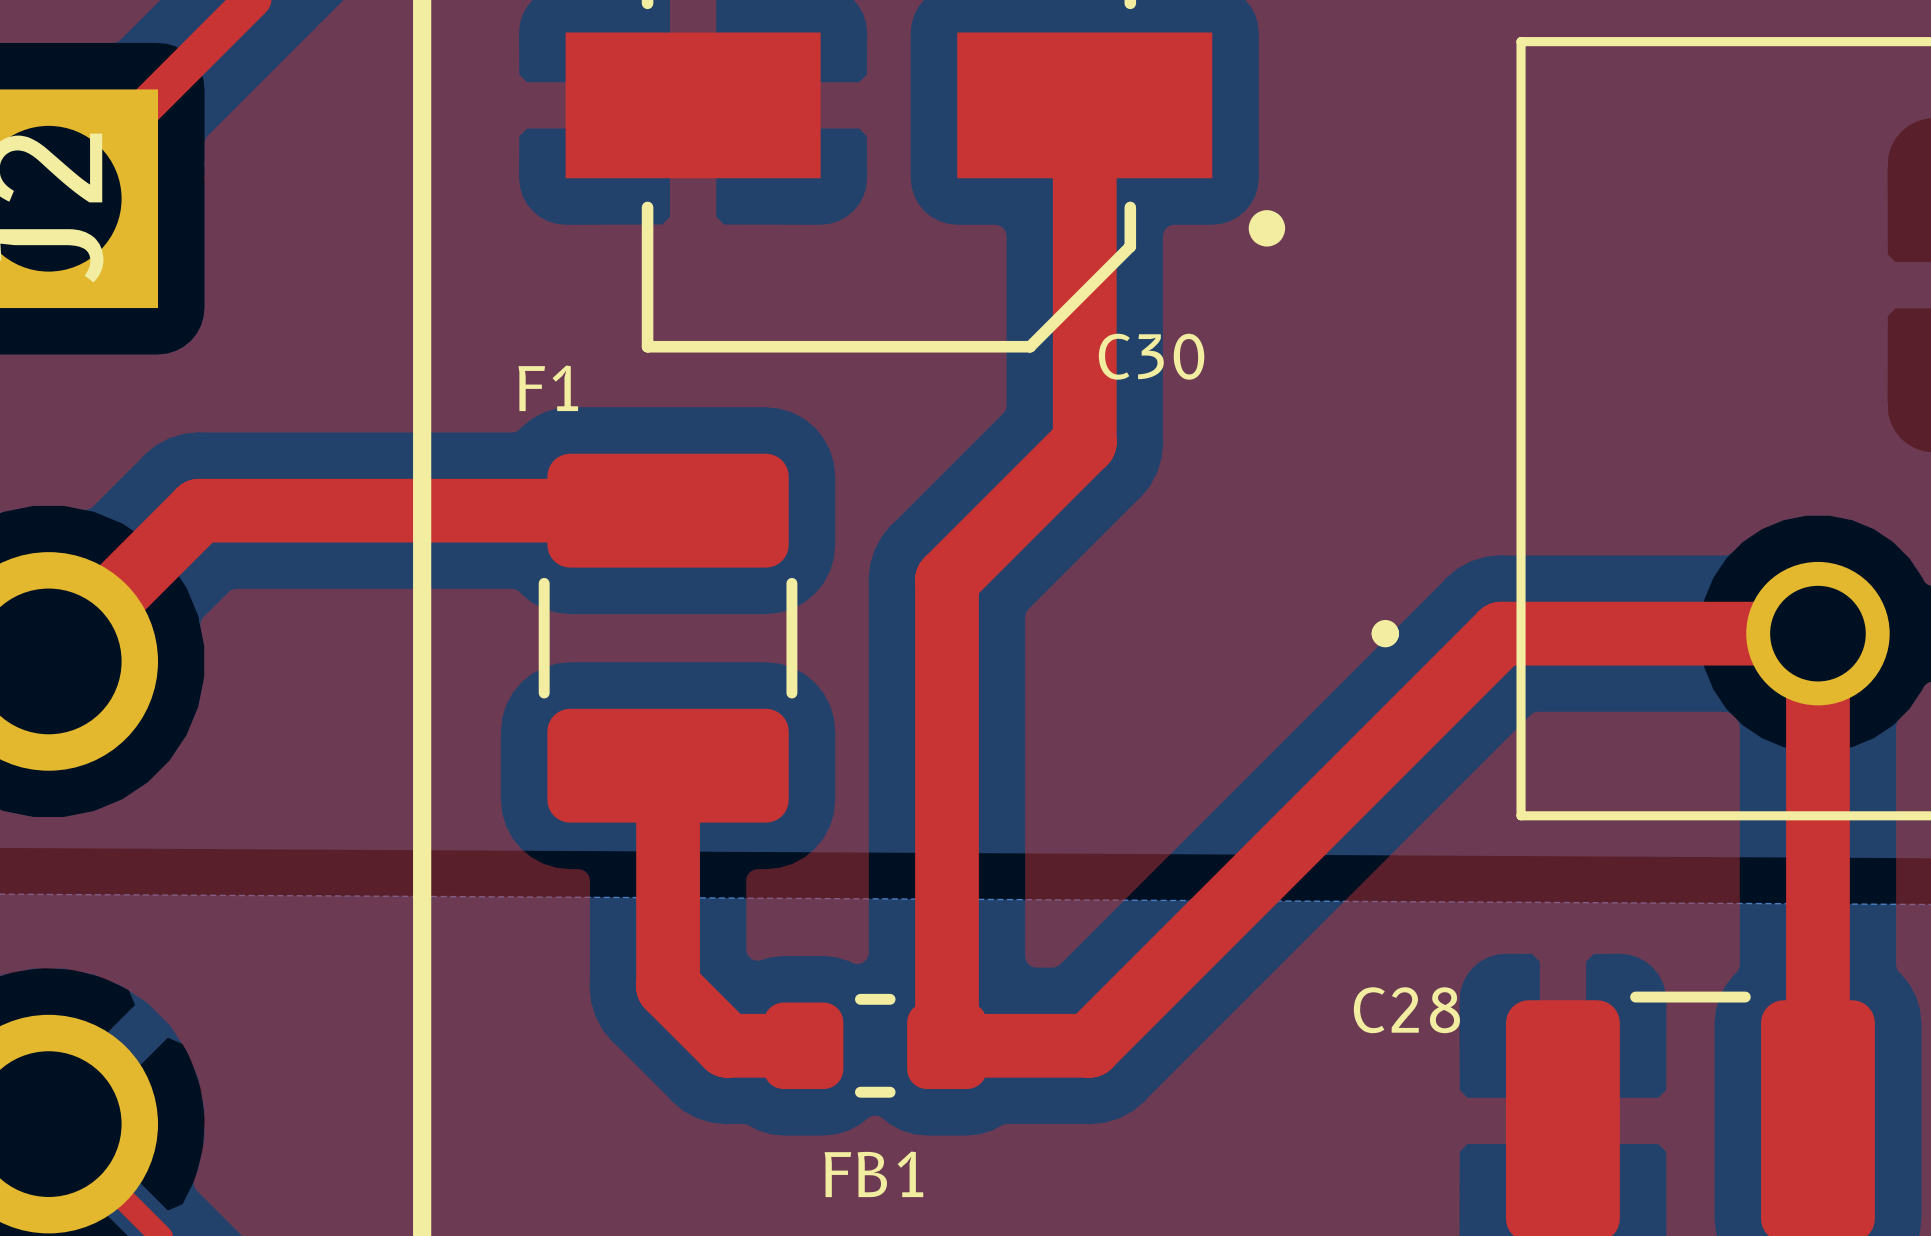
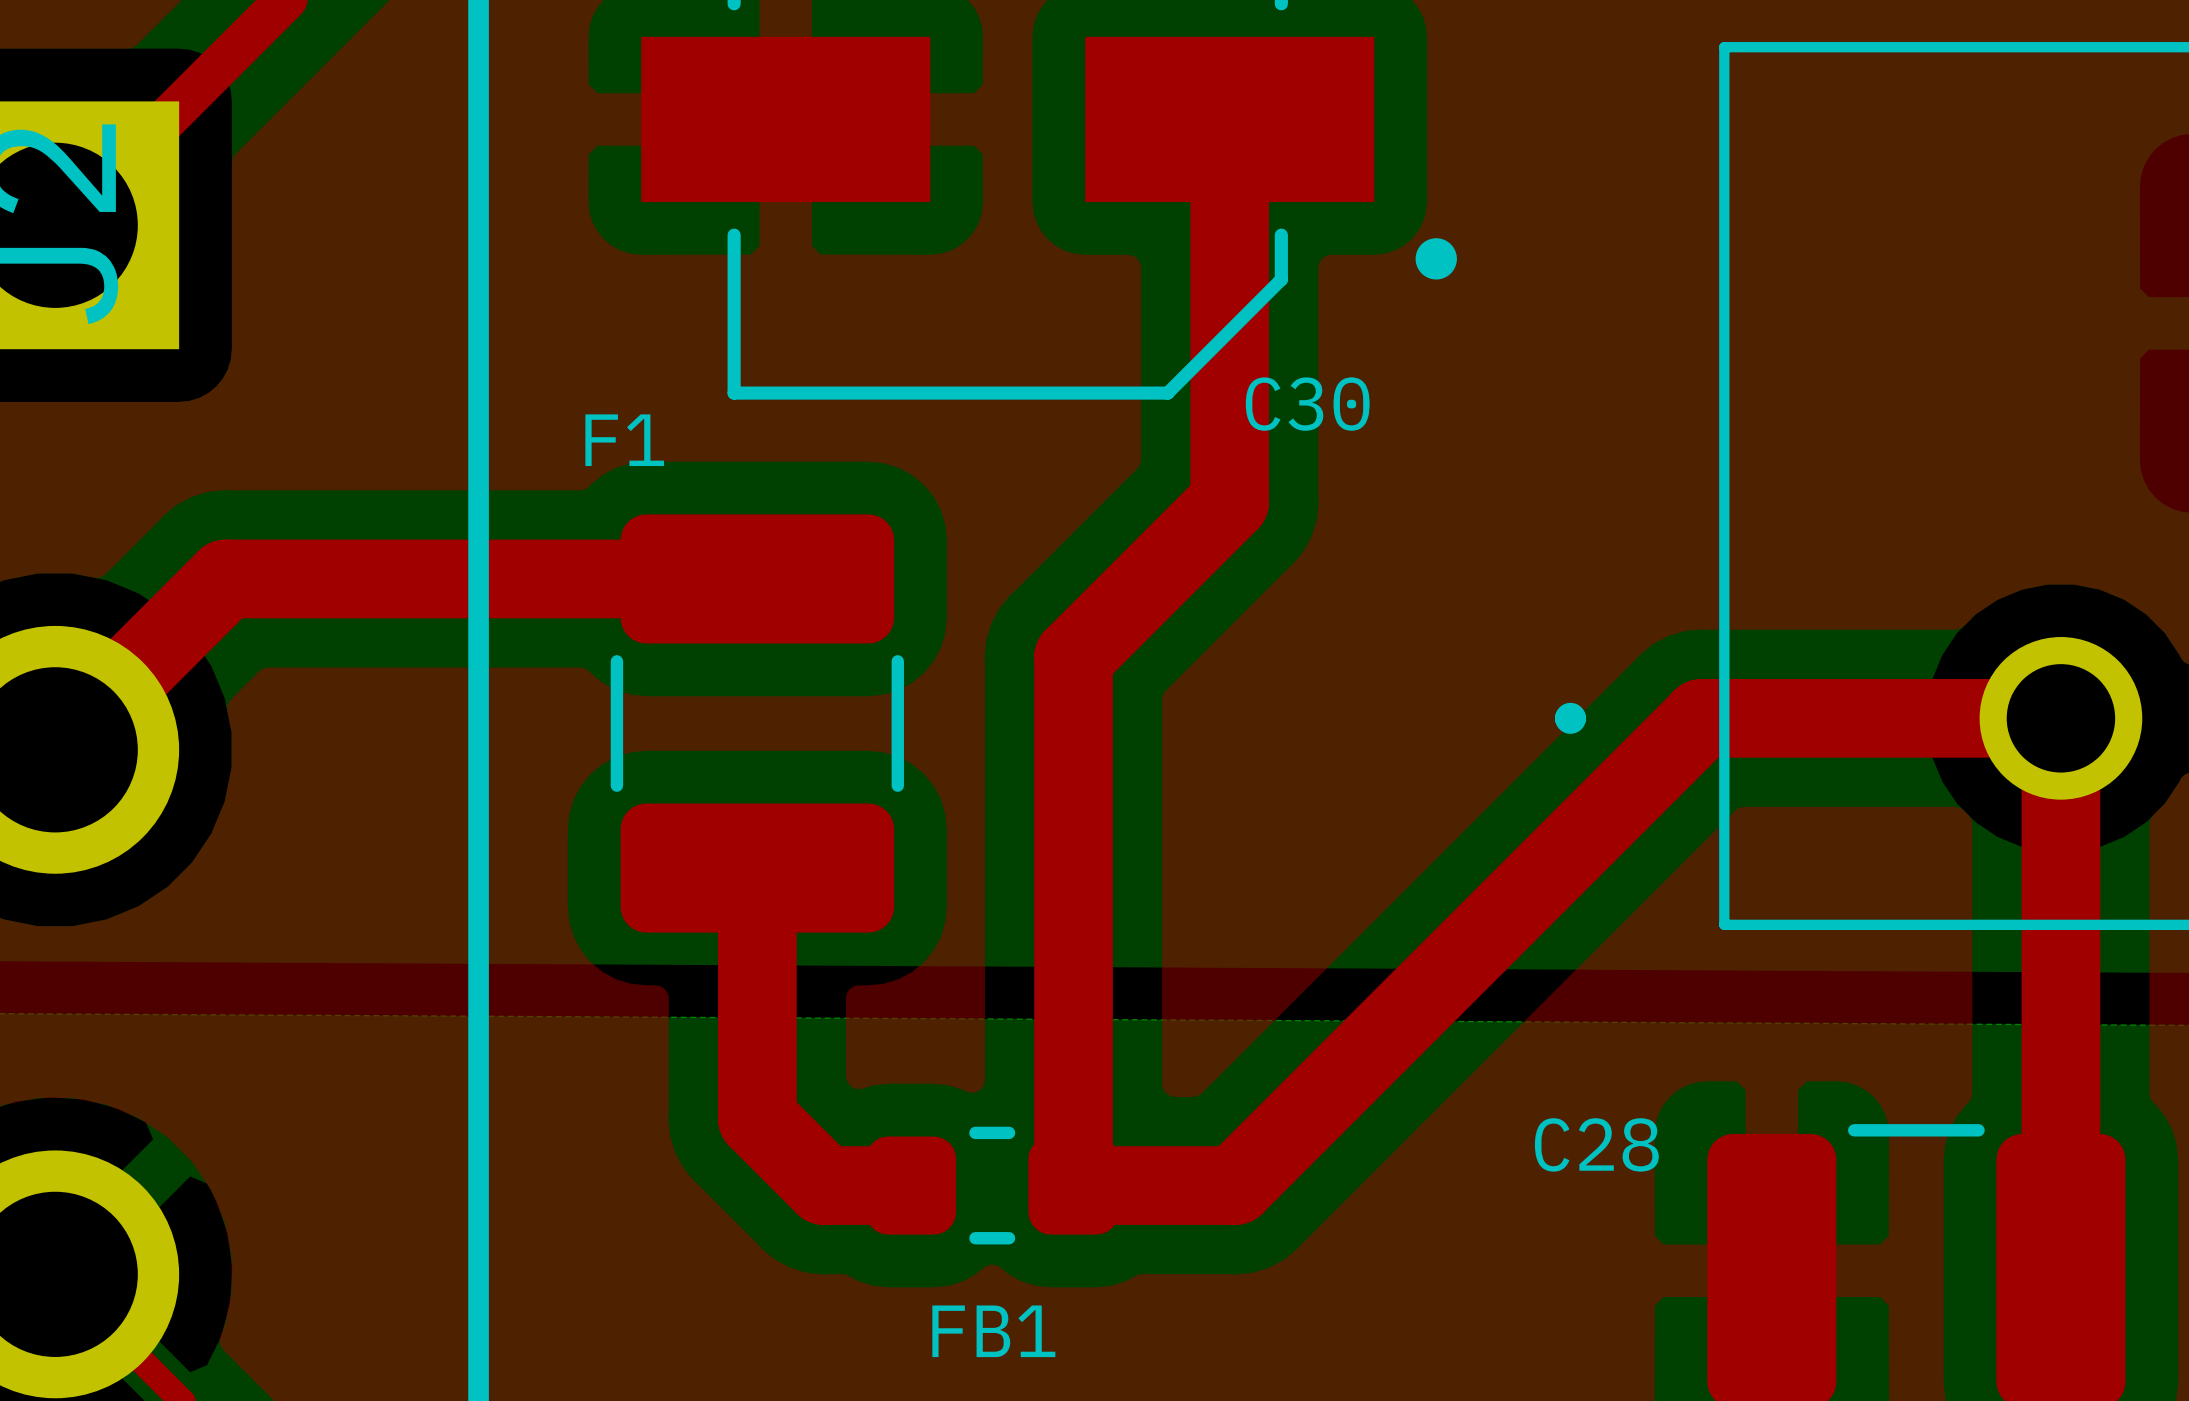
top track width: thin (1084, 105) (1084, 442) (946, 580) (946, 1045) (1089, 1045) (1501, 633) (1817, 633) (1817, 1120) -> thick (1229, 119) (1229, 501) (1073, 657) (1073, 1185) (1234, 1185) (1702, 718) (2060, 718) (2060, 1270)
top track width: thin (668, 510) (199, 510) (48, 661) -> thick (757, 578) (226, 578) (55, 749)
top track width: thin (668, 765) (668, 986) (727, 1045) (803, 1045) -> thick (757, 868) (757, 1118) (824, 1185) (910, 1185)

